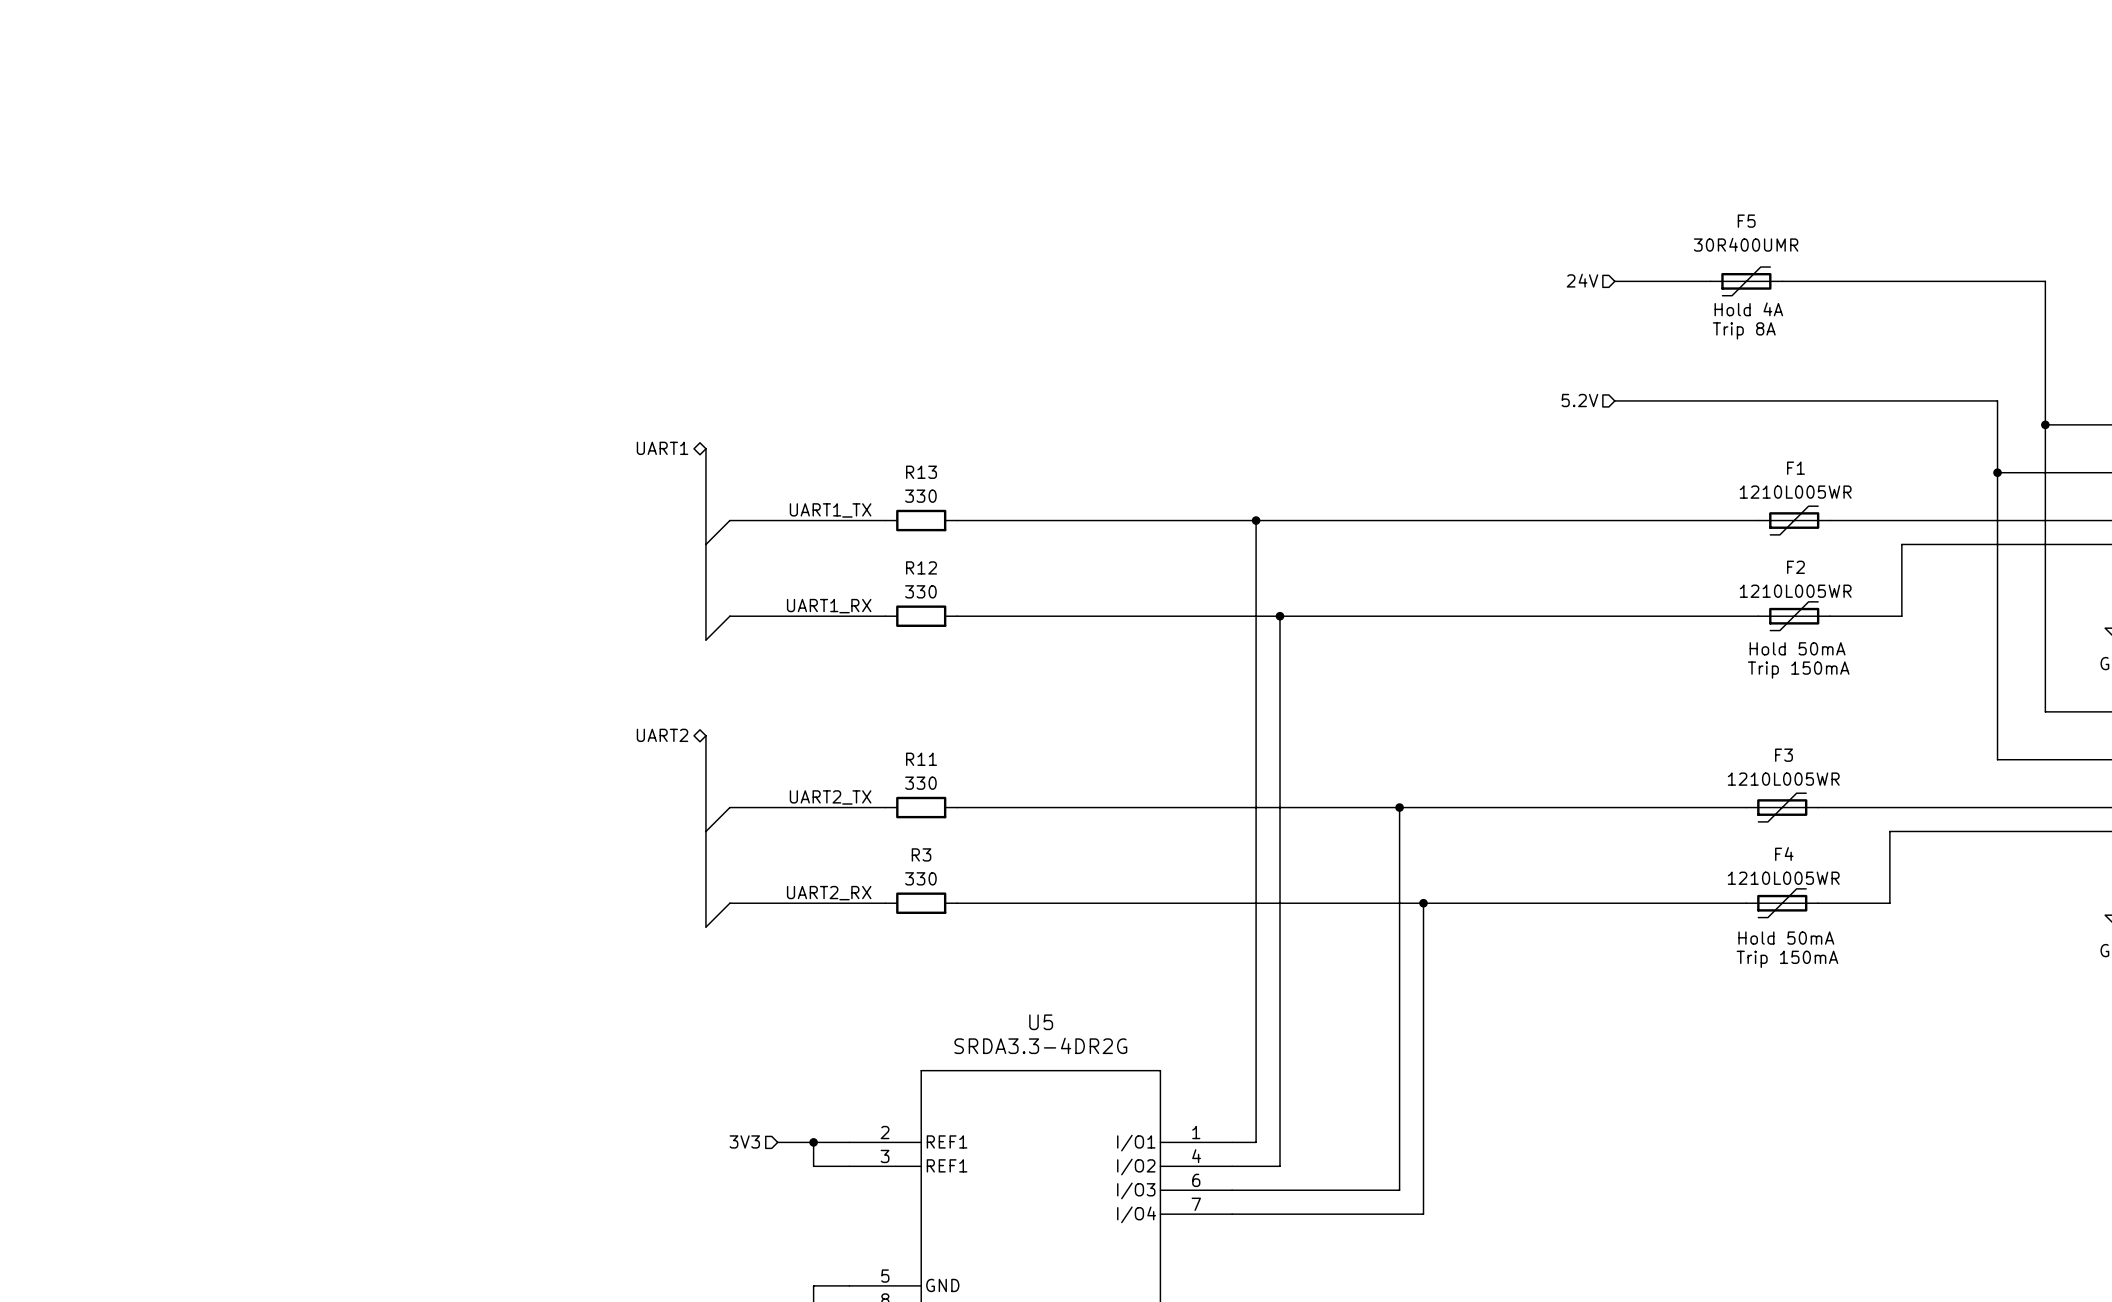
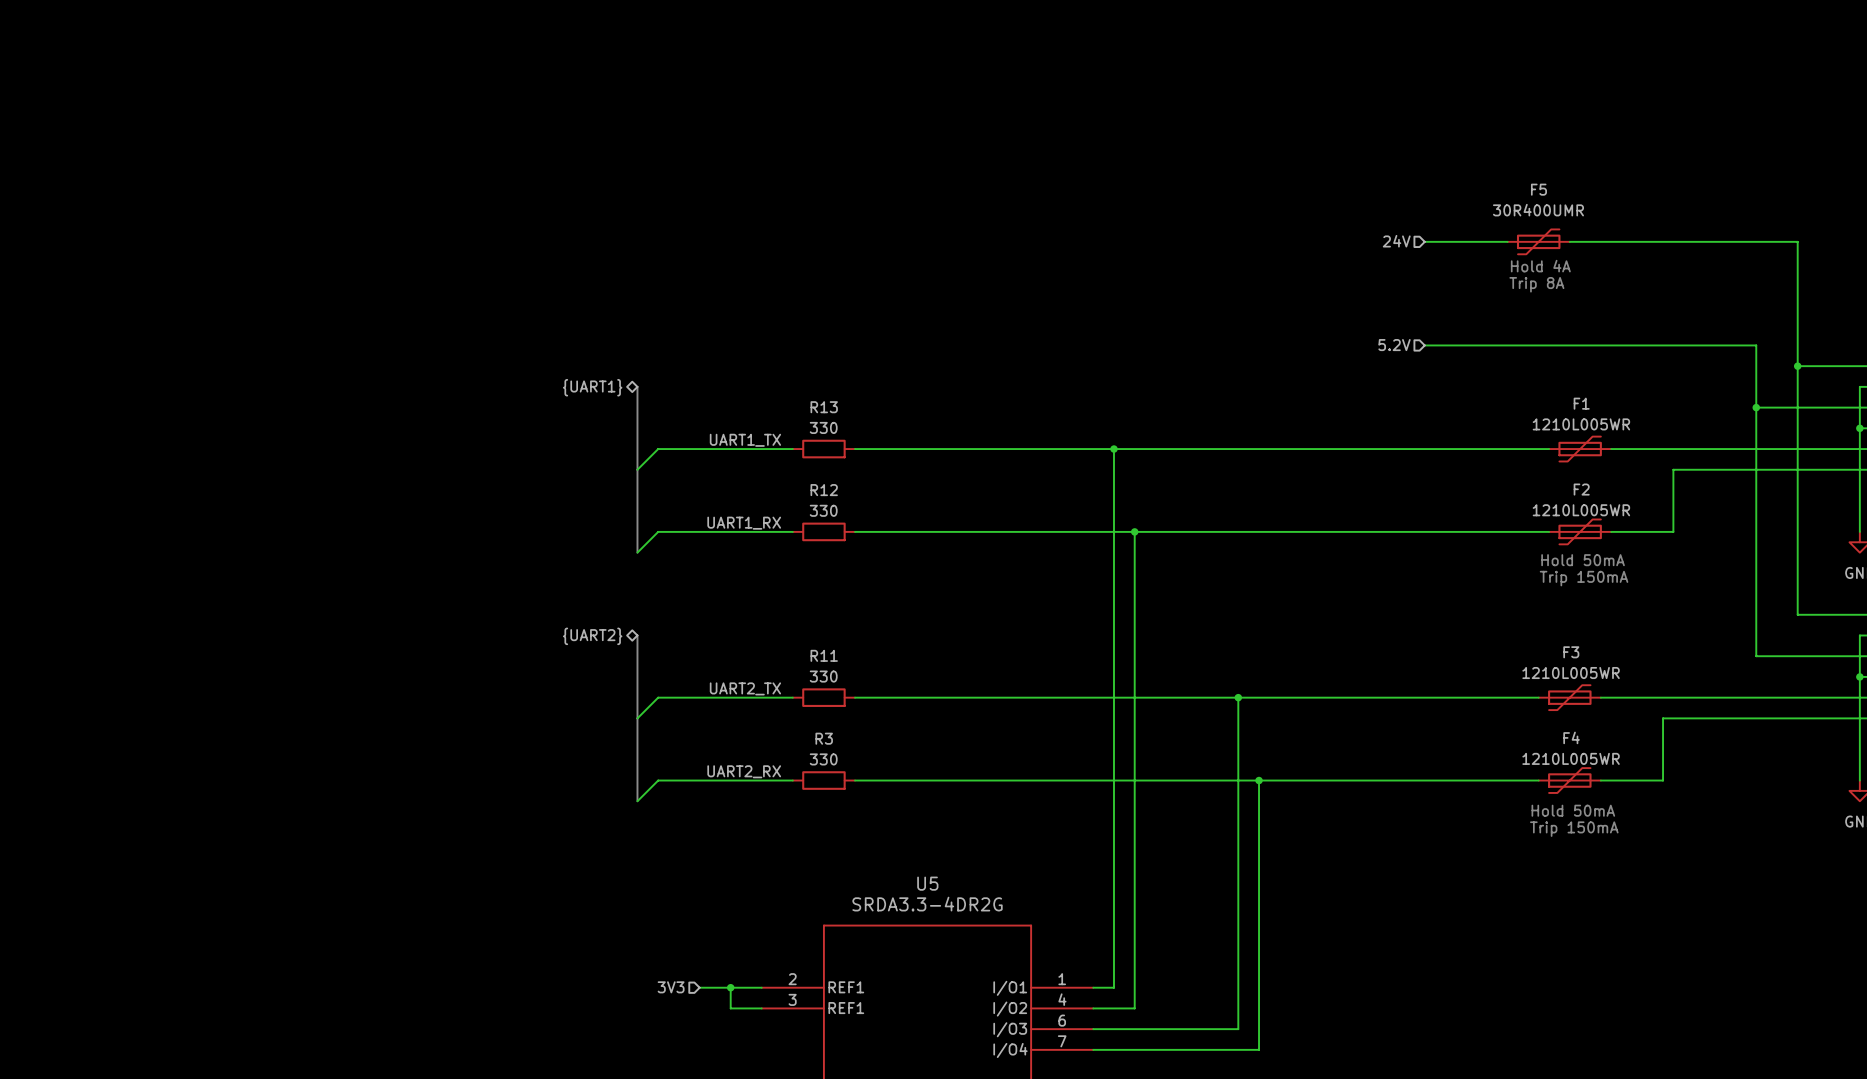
hierarchical label: UART1 (662, 448) -> {UART1} (592, 387)
hierarchical label: UART2 (662, 735) -> {UART2} (592, 636)

